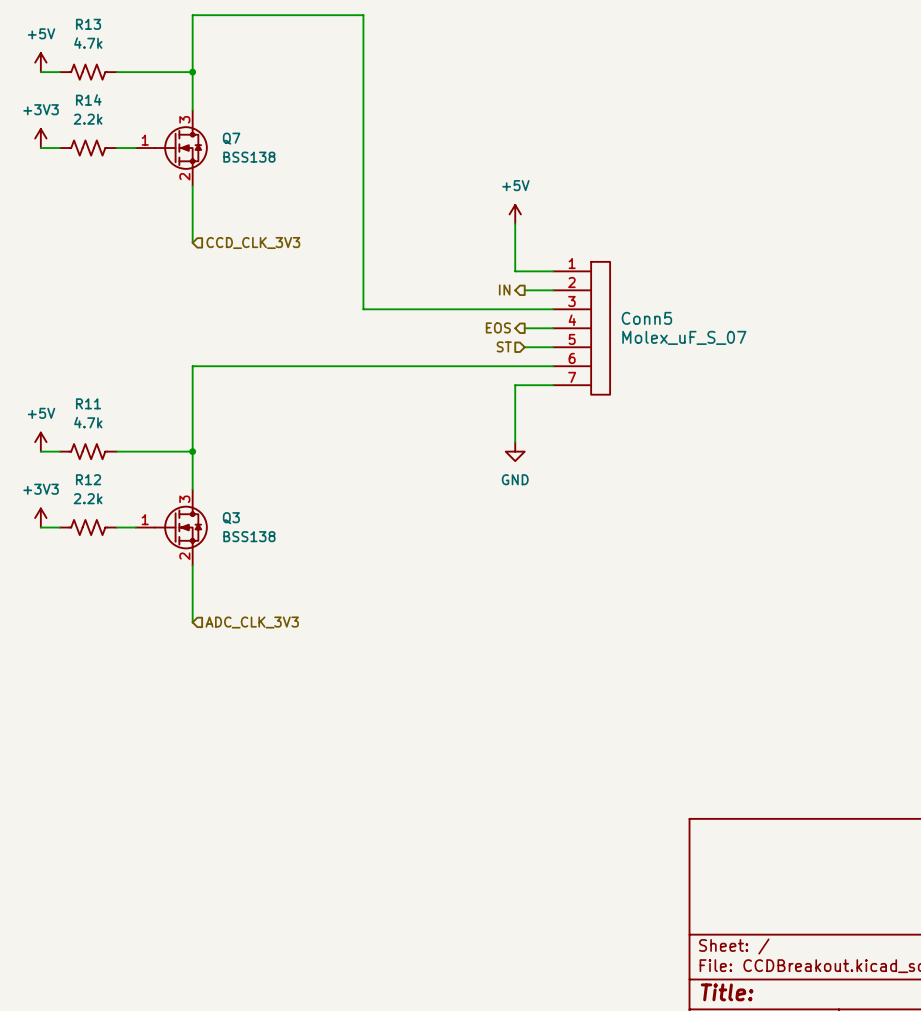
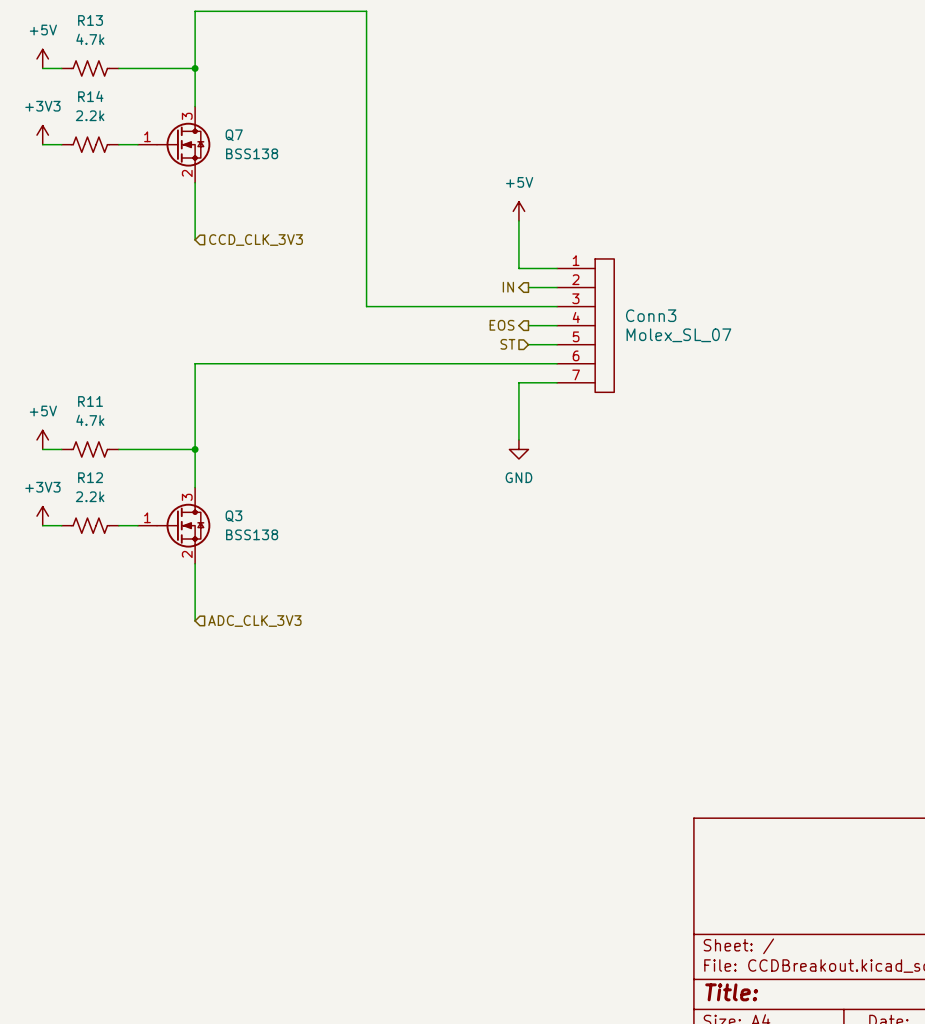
Conn5 name: Conn5 (646, 318) -> Conn3 (651, 315)
Conn5 value: Molex_uF_S_07 (684, 337) -> Molex_SL_07 (678, 335)

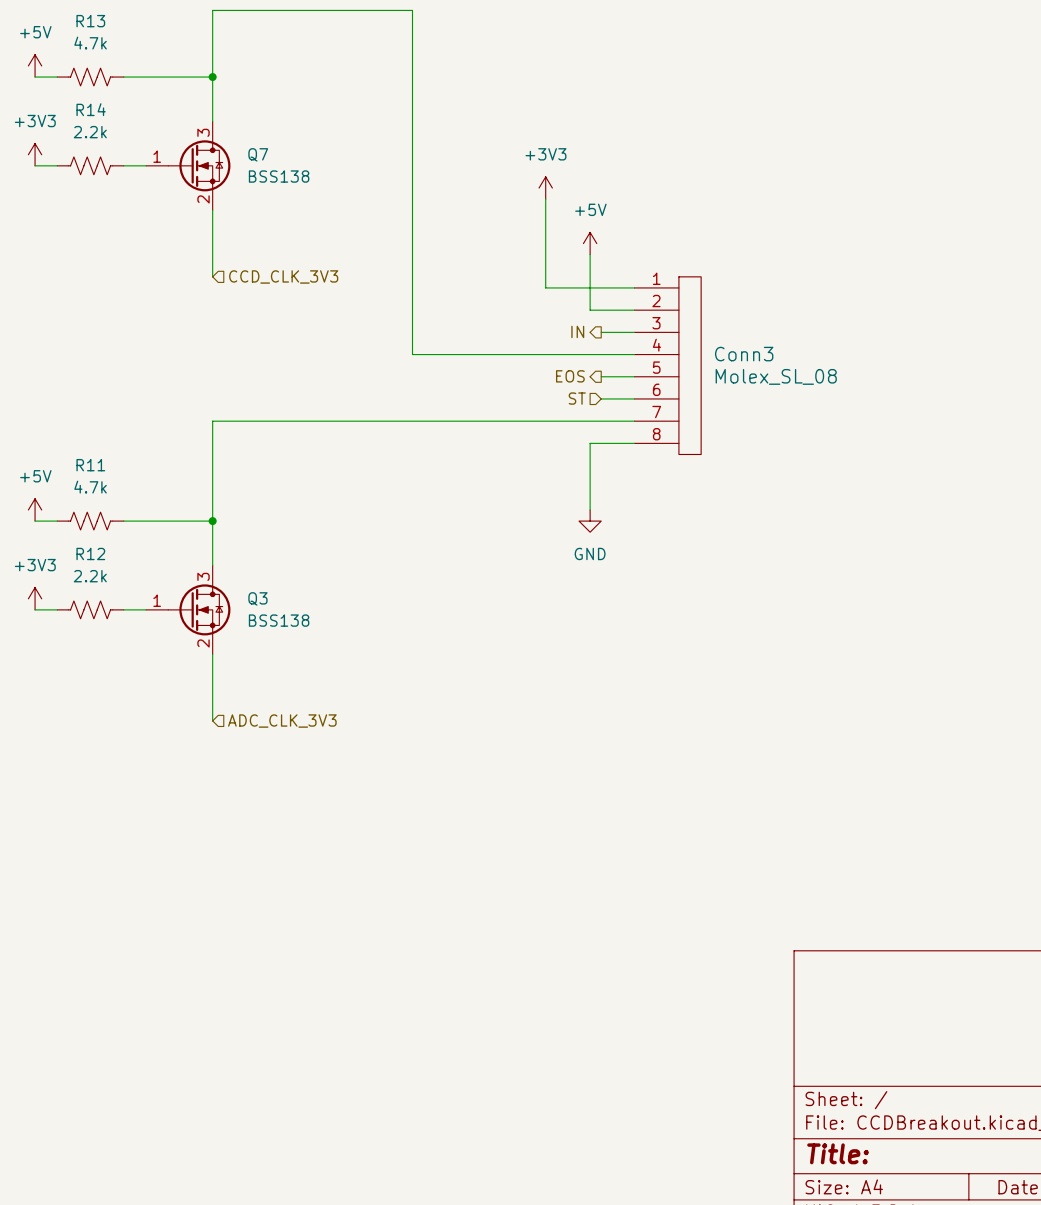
power symbol: none -> +3V3 (545, 188)
wire: none -> (545, 199) (545, 287) (634, 287)
Conn3 symbol: [557, 258, 615, 393] -> [634, 276, 702, 455]
Conn3 value: Molex_SL_07 (678, 335) -> Molex_SL_08 (776, 376)

